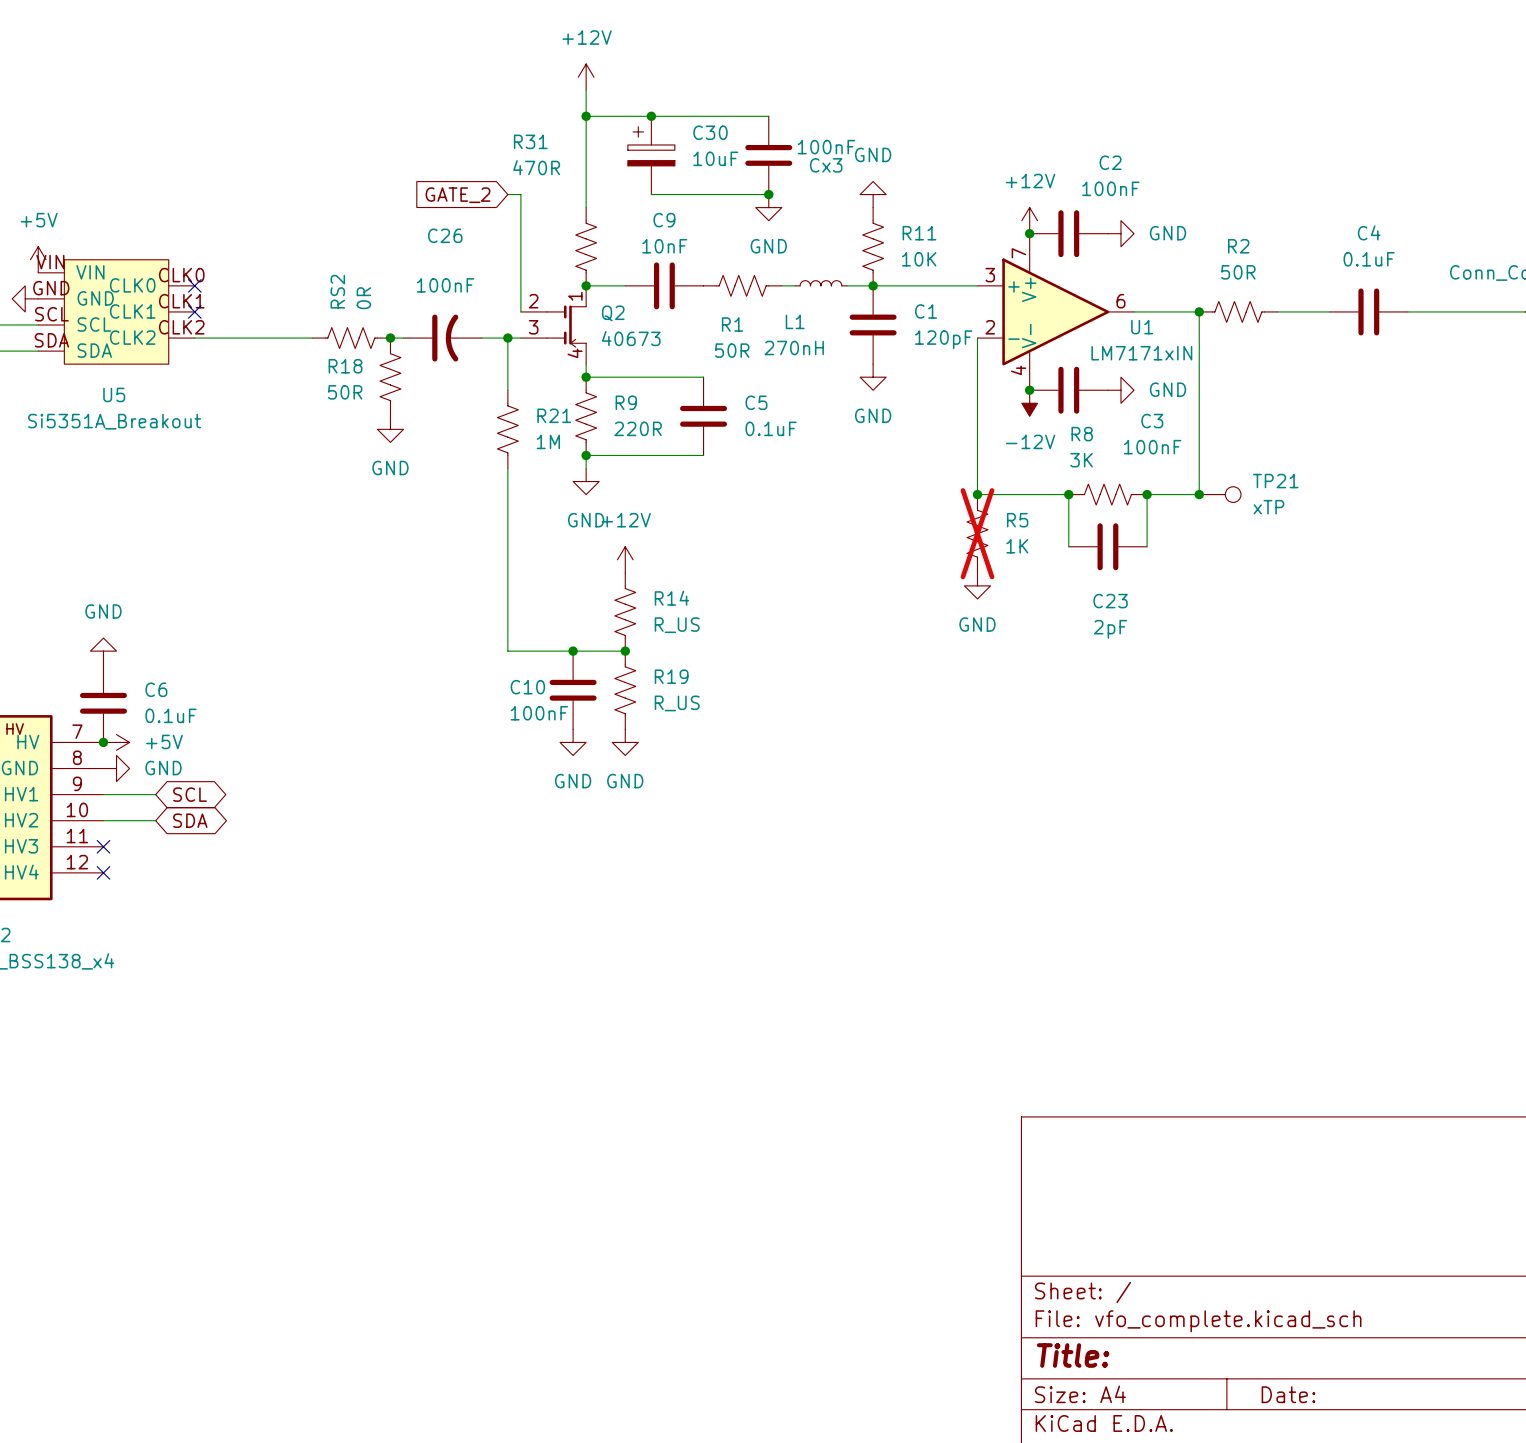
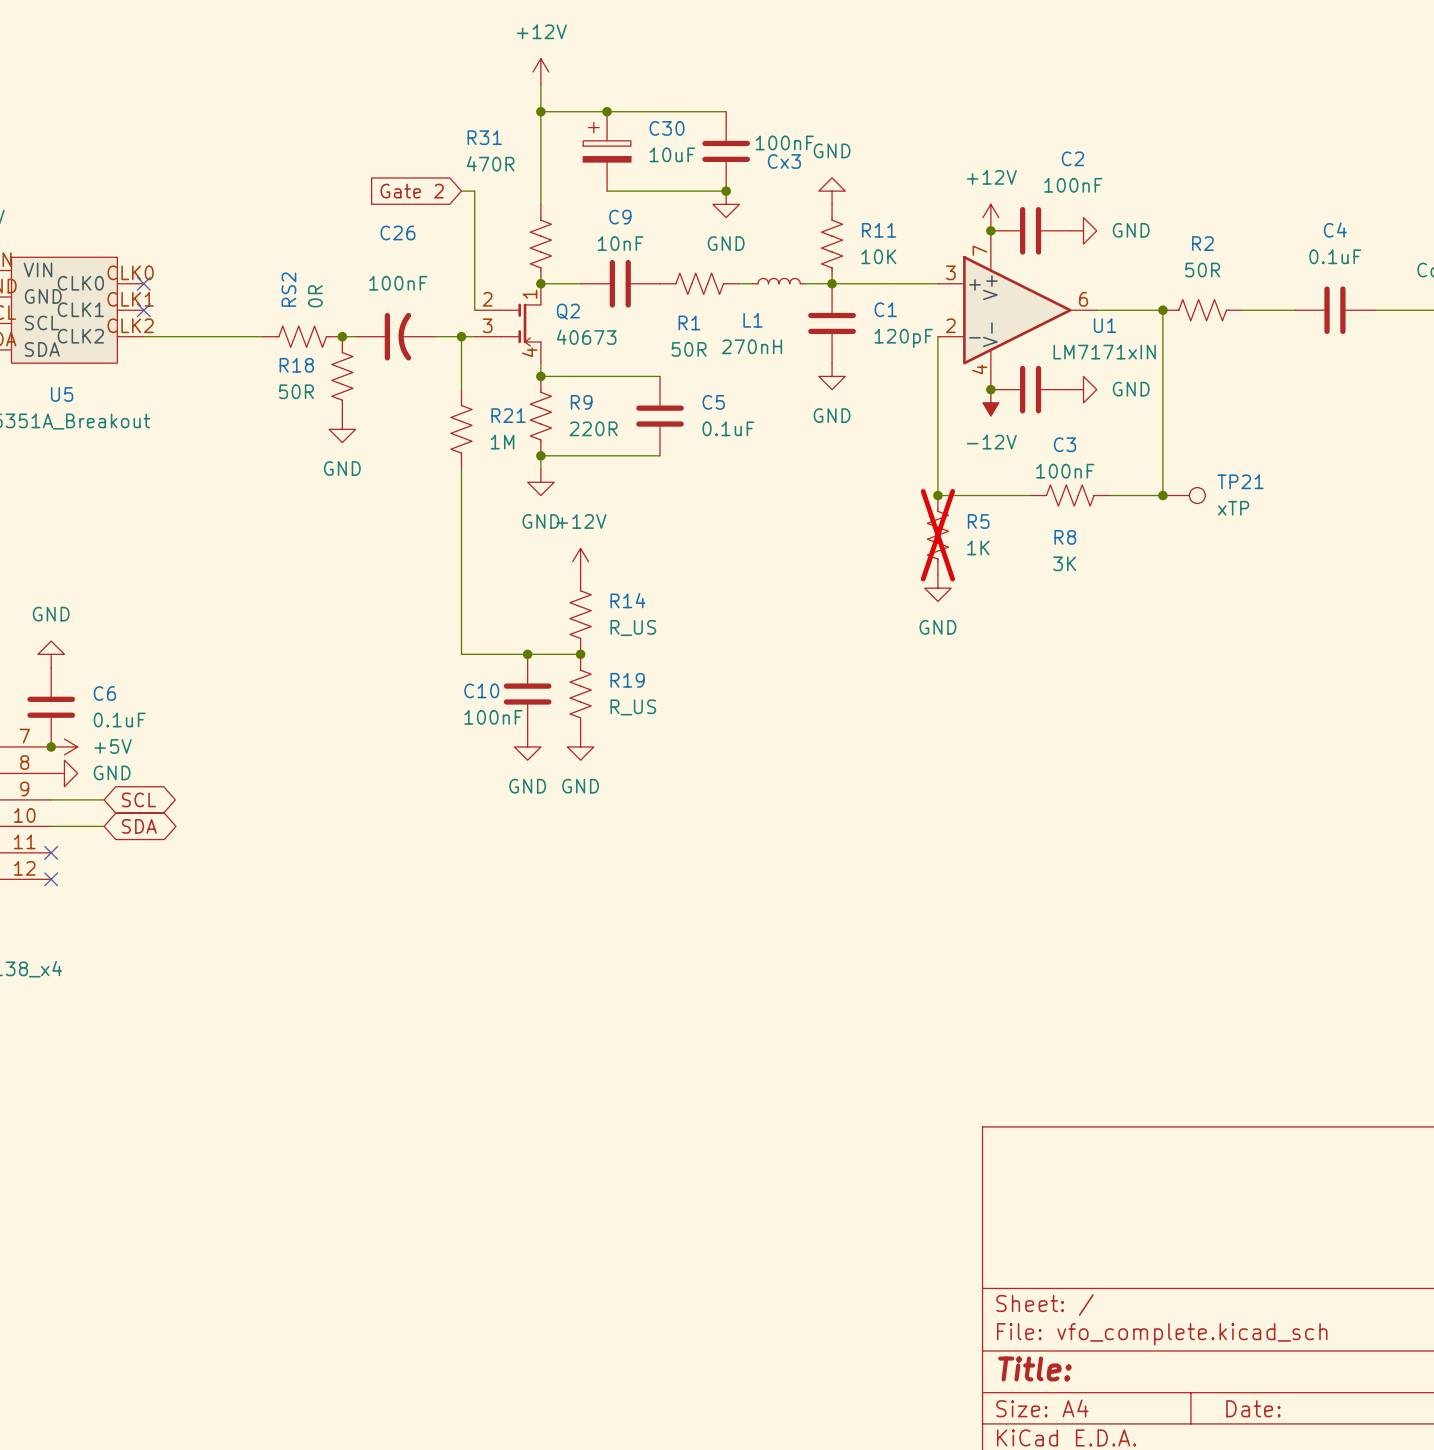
global label: GATE_2 (458, 195) -> Gate 2 (412, 191)
C3 name position: C3 (1152, 421) -> C3 (1064, 444)
R8 name position: R8 (1082, 434) -> R8 (1065, 537)
C3 value position: 100nF (1152, 447) -> 100nF (1065, 471)
R8 value position: 3K (1081, 460) -> 3K (1064, 563)
wire: (1068, 494) (1068, 546) -> none
junction: (1068, 494) -> none
wire: (1147, 494) (1147, 546) -> none
junction: (1147, 494) -> none
C23: 2pF (1107, 546) -> none

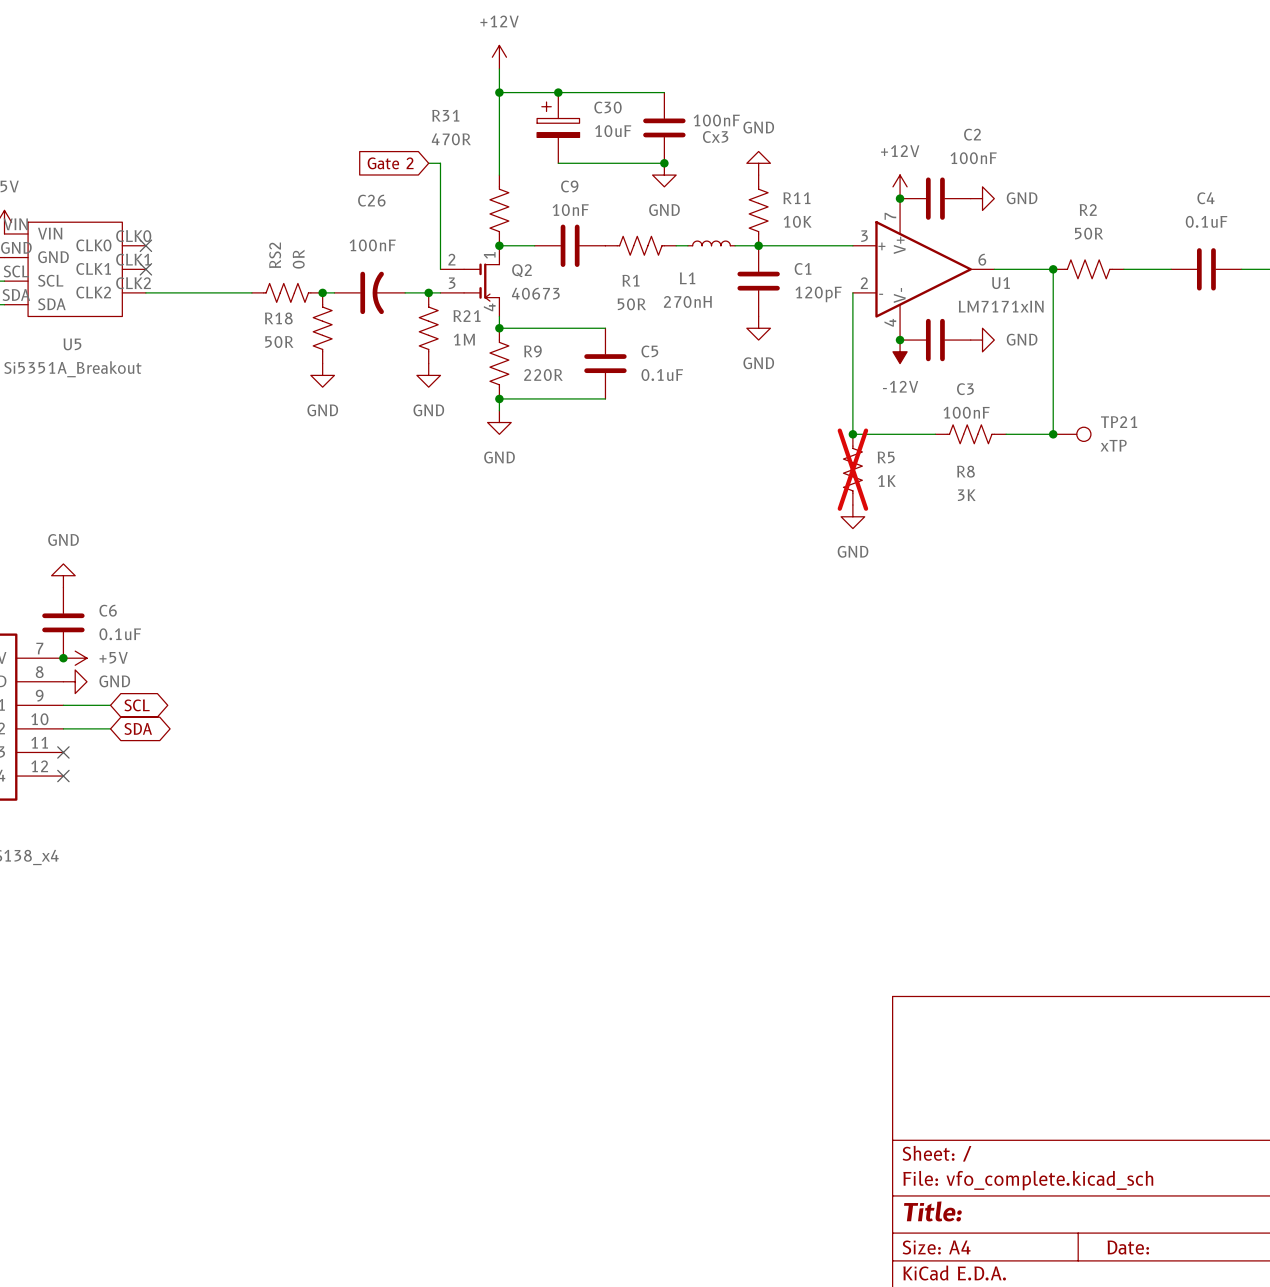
wire: (461, 336) (461, 389) -> none
R21 position: (461, 429) -> (428, 328)
power symbol: none -> GND (428, 375)
wire: (461, 469) (461, 654) (580, 654) -> none
power symbol: +12V (580, 561) -> none
R14: R_US (580, 614) -> none
junction: (527, 654) -> none
junction: (580, 654) -> none
C10: 100nF (527, 694) -> none
R19: R_US (580, 694) -> none
power symbol: GND (527, 746) -> none
power symbol: GND (580, 746) -> none

